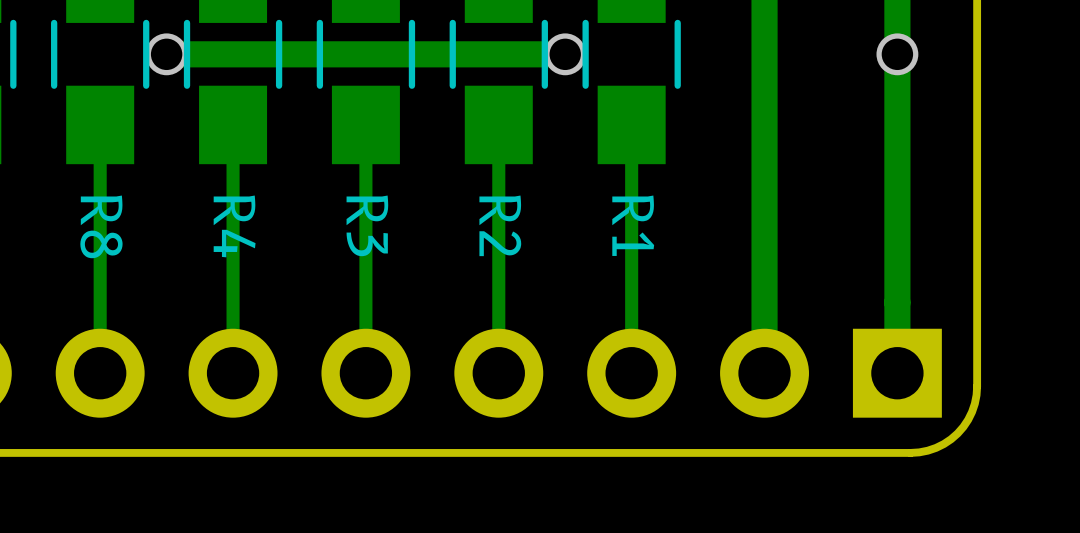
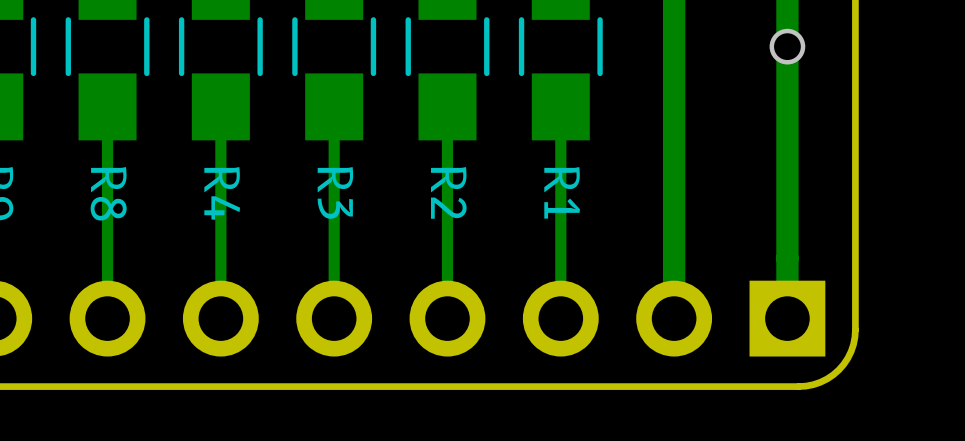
via: (166, 54) -> none
track: (565, 54) (166, 54) -> none
via: (565, 54) -> none

